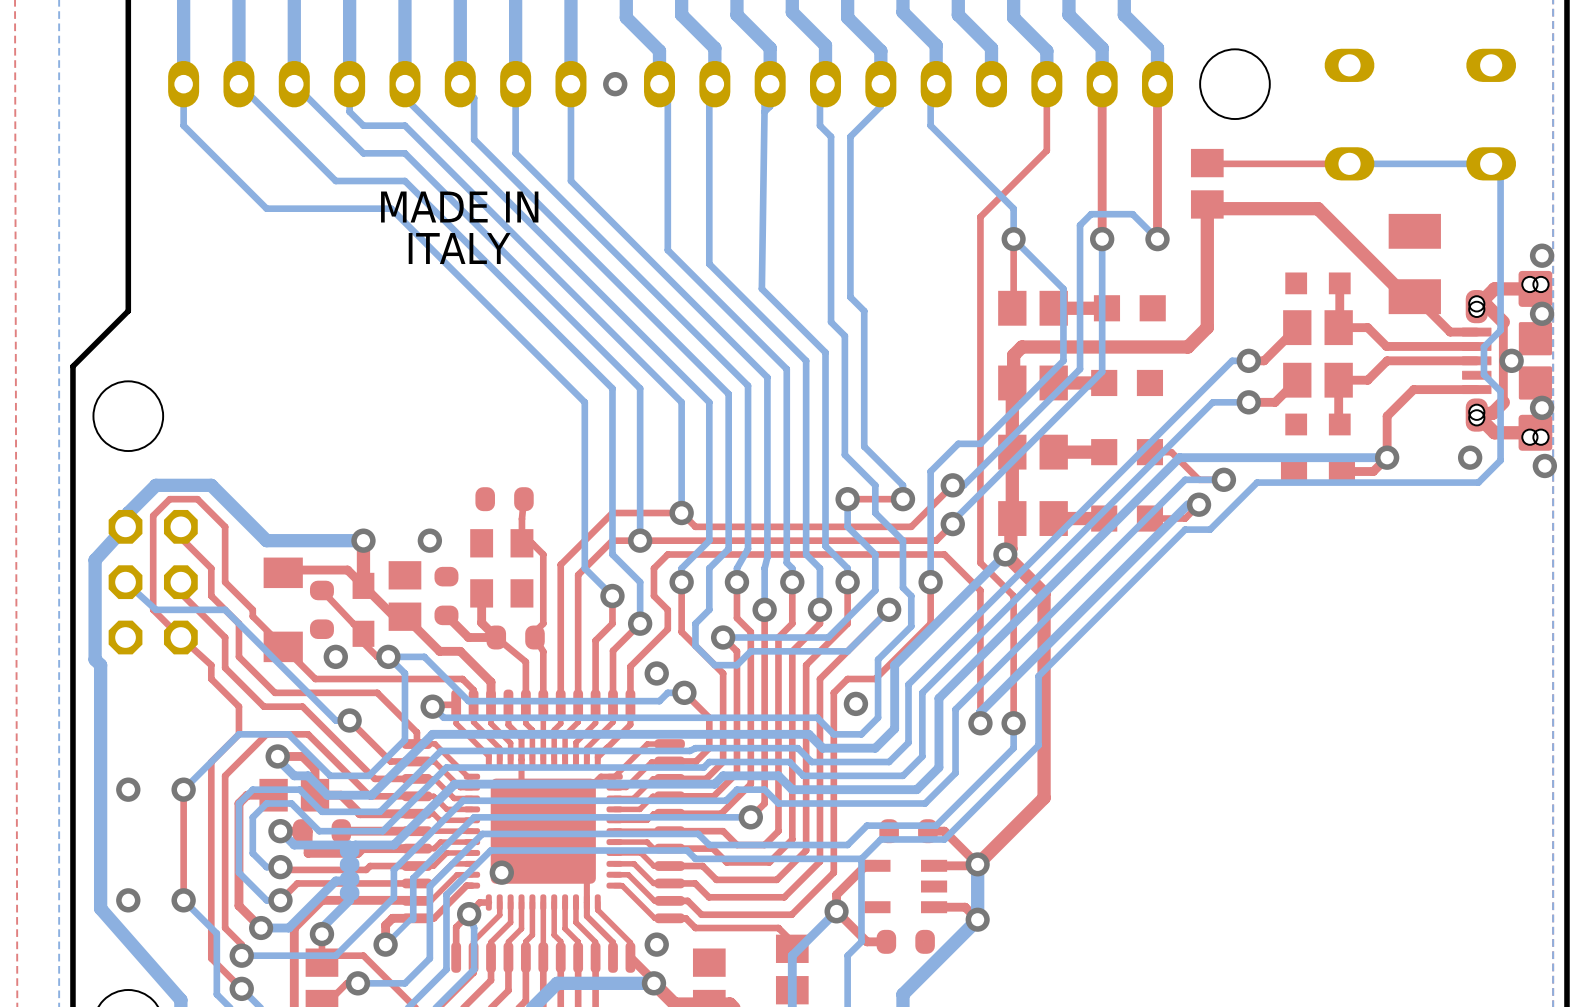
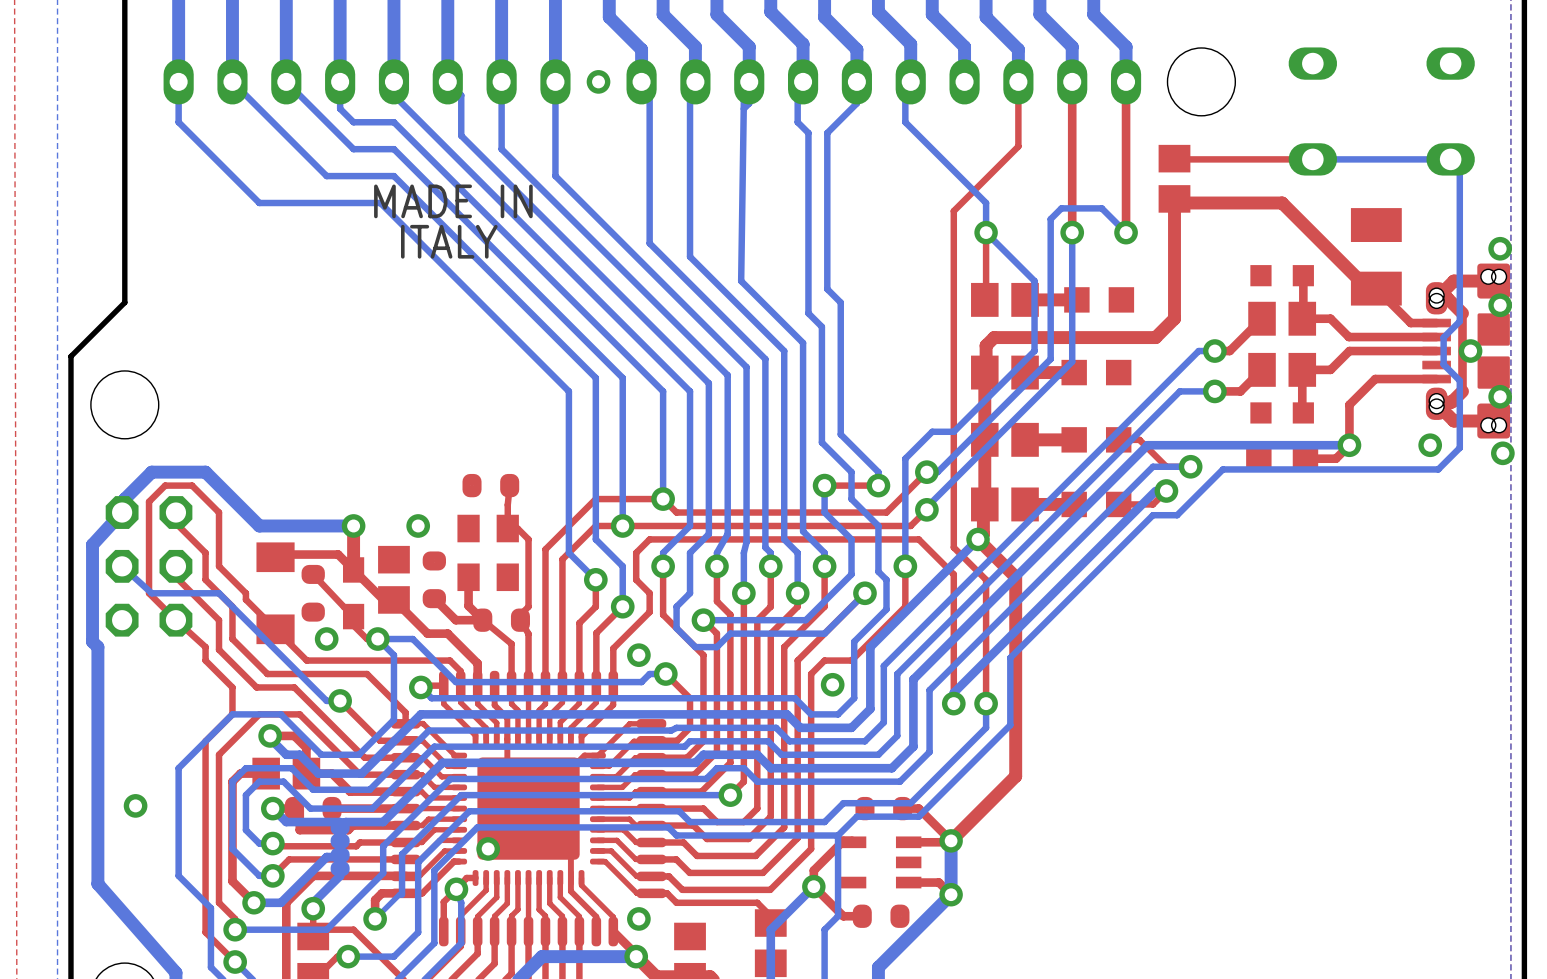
via: (128, 789) -> none
top track: (183, 789) (183, 900) -> none
bottom track: none -> (178, 768) (178, 875)
via: (183, 789) -> none
via: none -> (135, 805)
via: (128, 900) -> none
via: (183, 900) -> none

